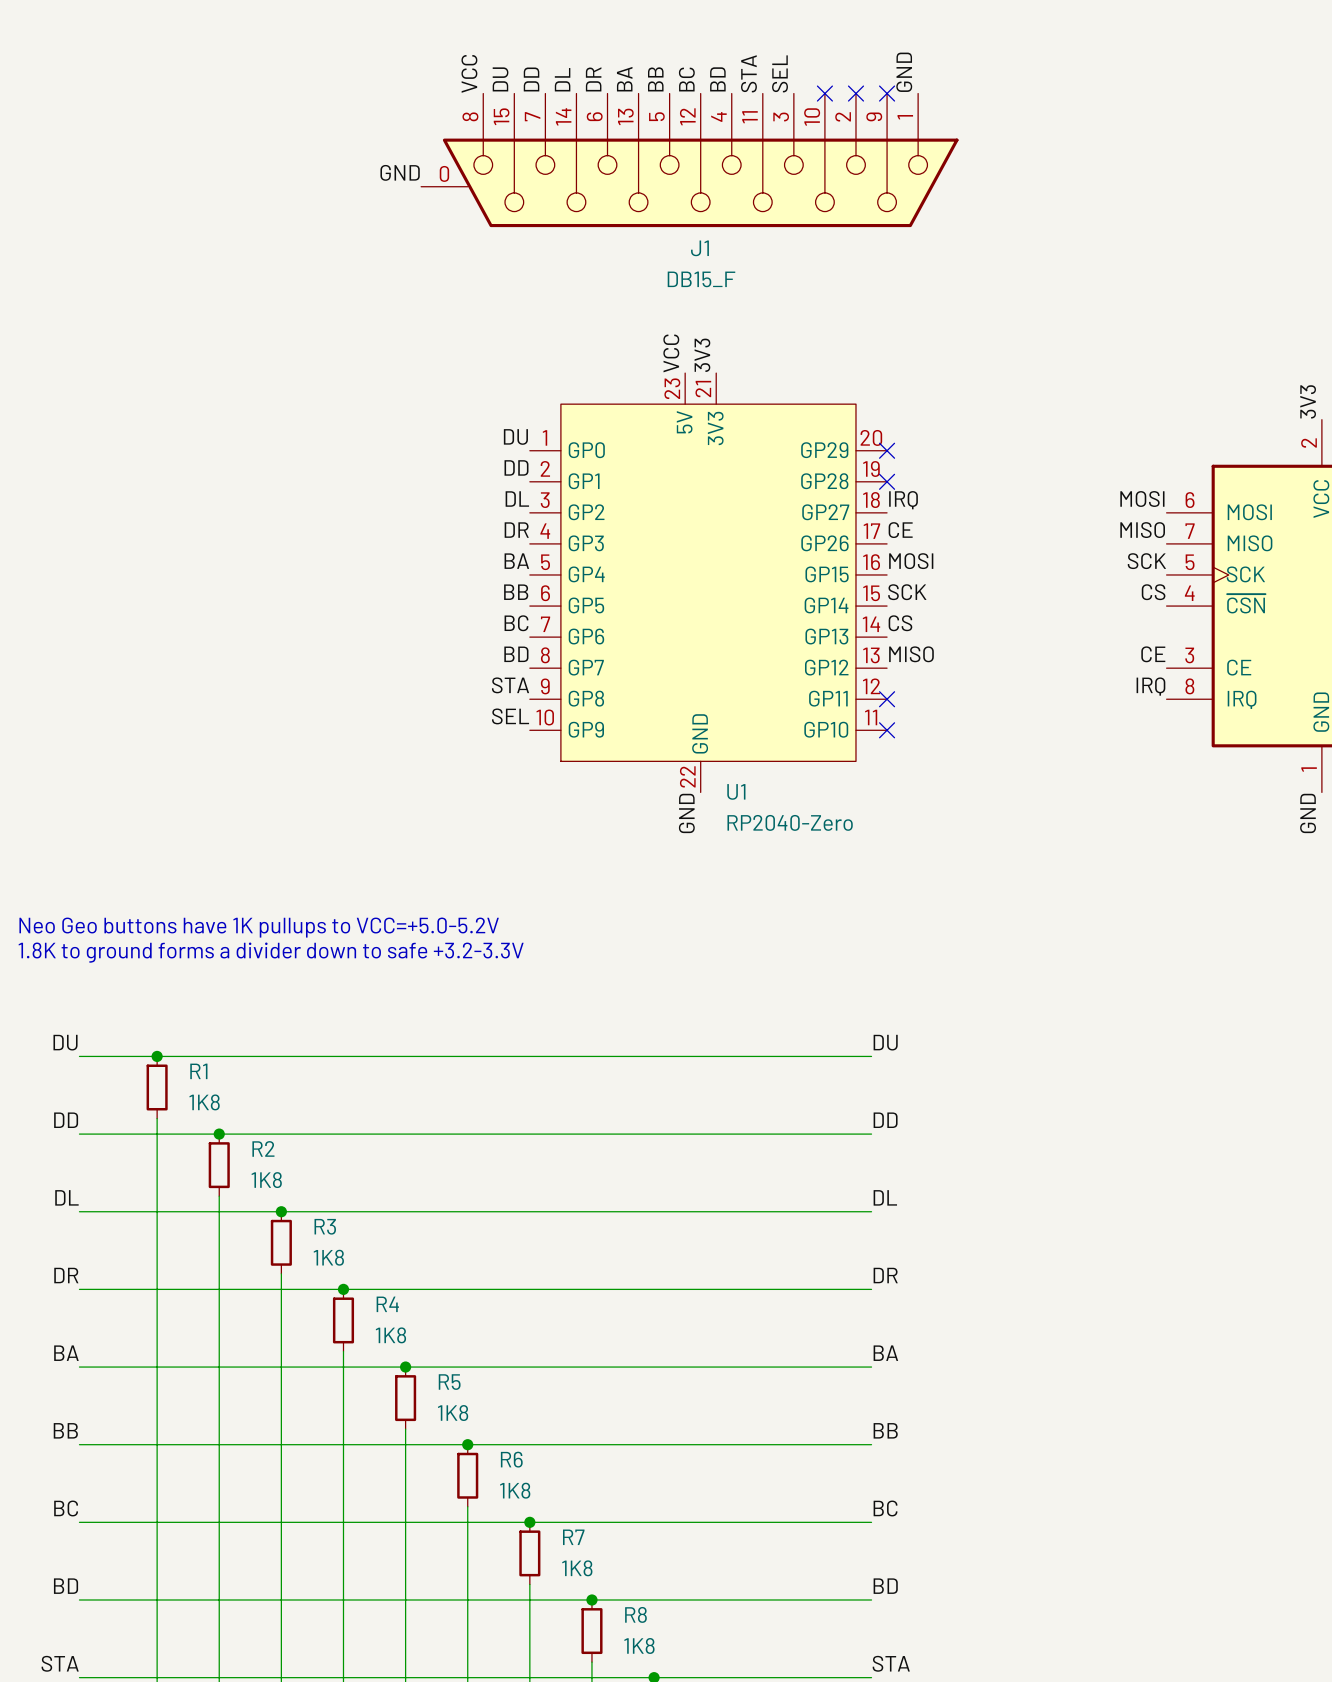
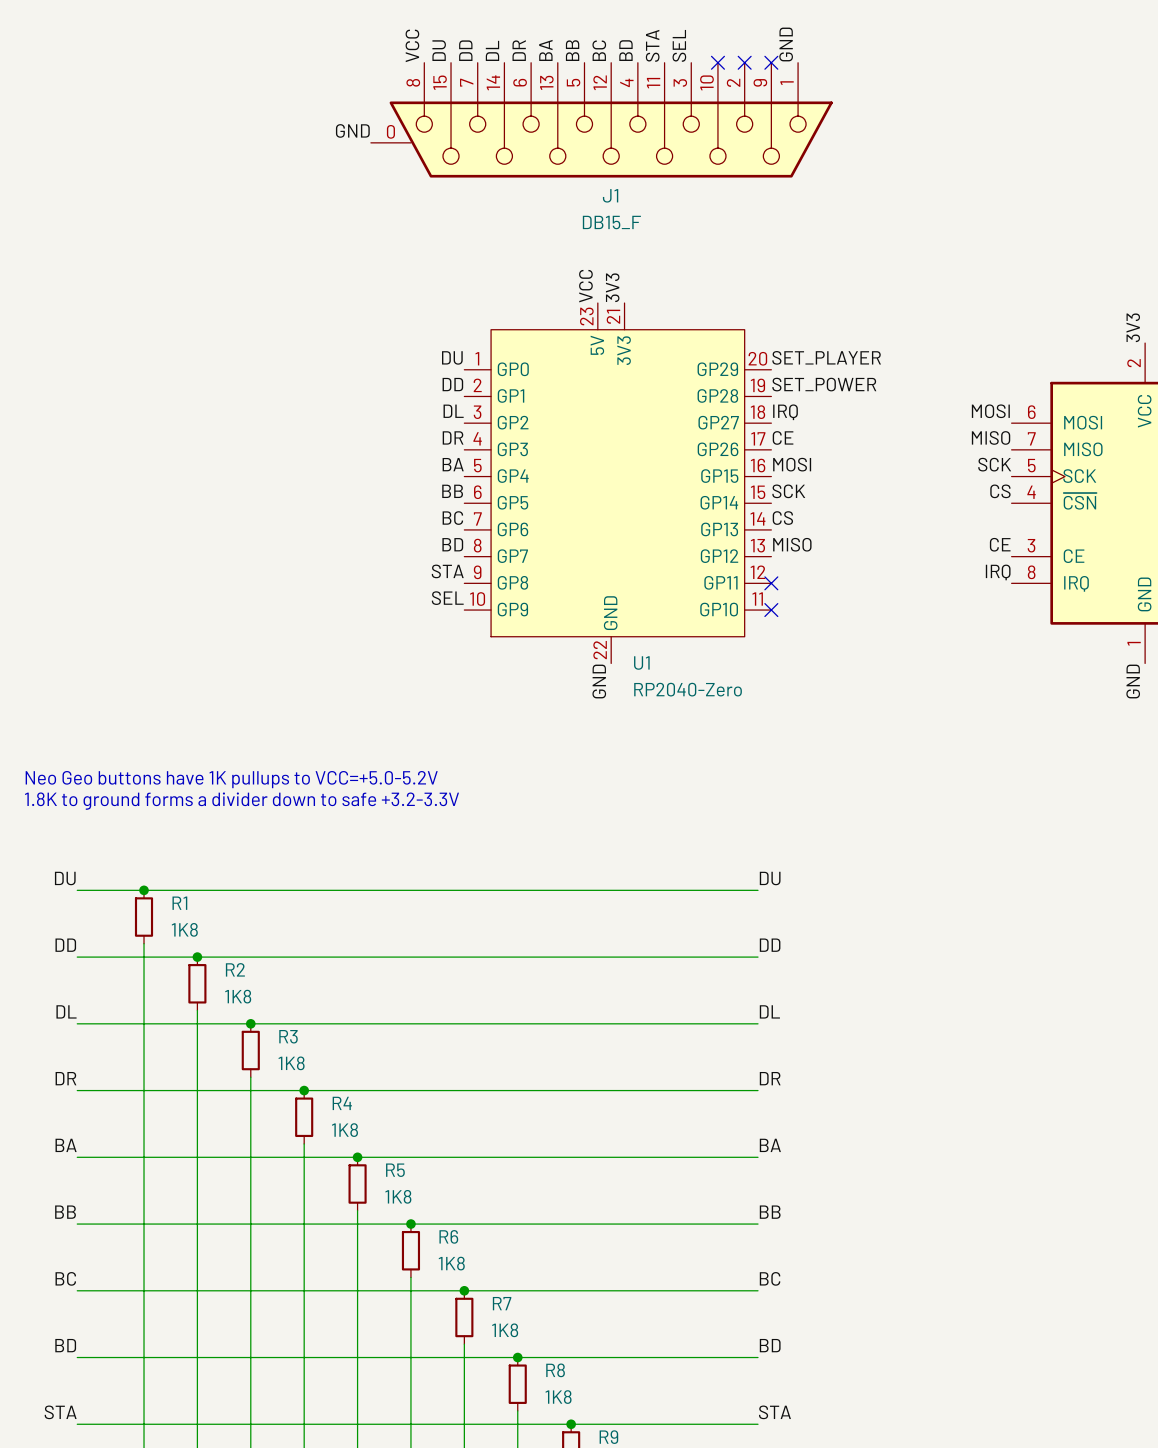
label: none -> SET_PLAYER (826, 357)
no-connect mark: (887, 450) -> none
label: none -> SET_POWER (824, 384)
no-connect mark: (887, 481) -> none

